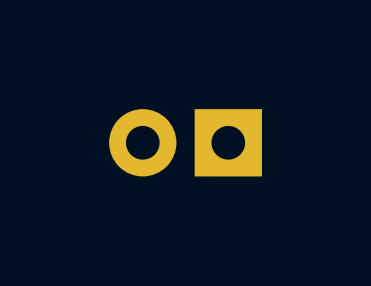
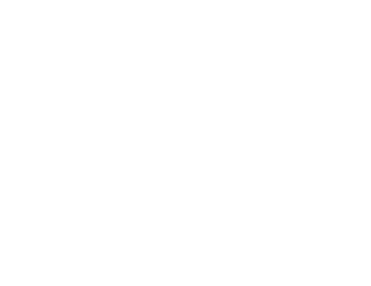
part: (185, 142) -> none

